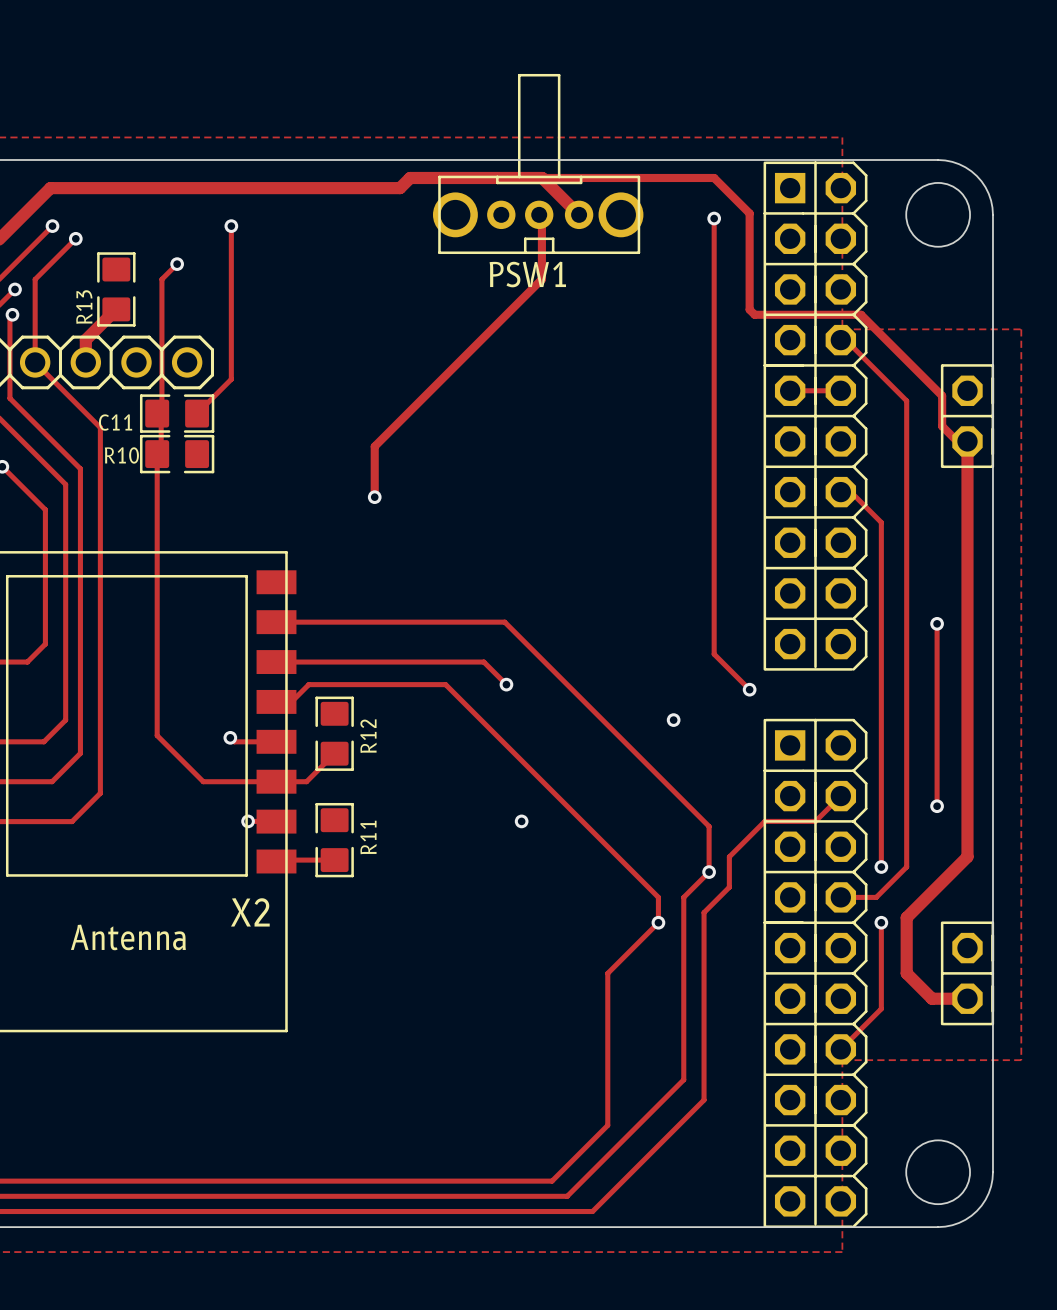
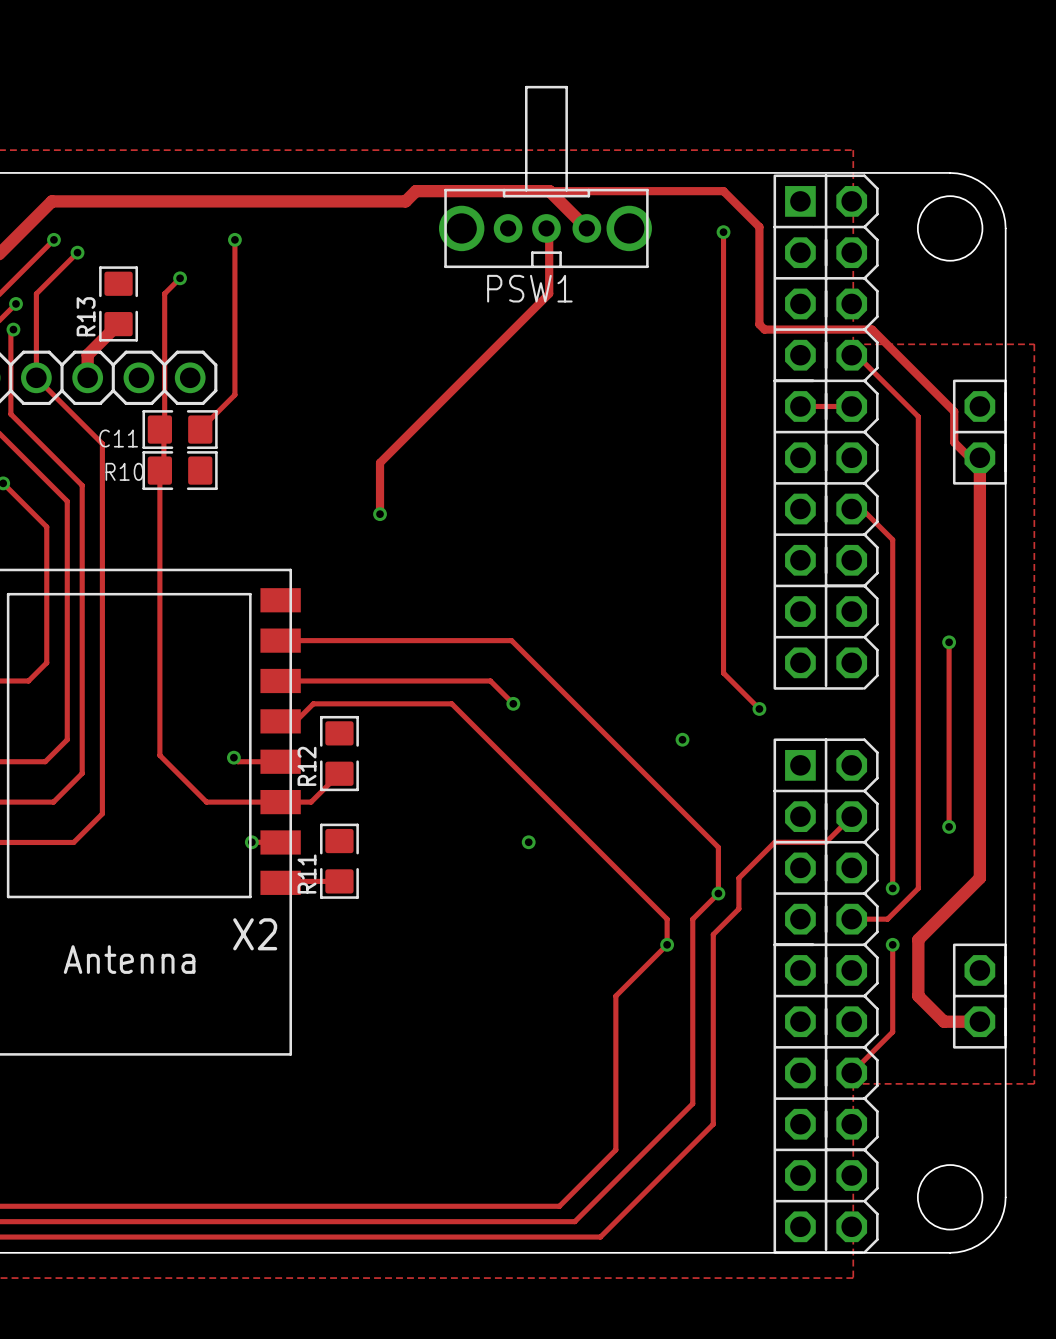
R12 name position: R12 (368, 736) -> R12 (307, 766)
R11 name position: R11 (368, 837) -> R11 (307, 874)

